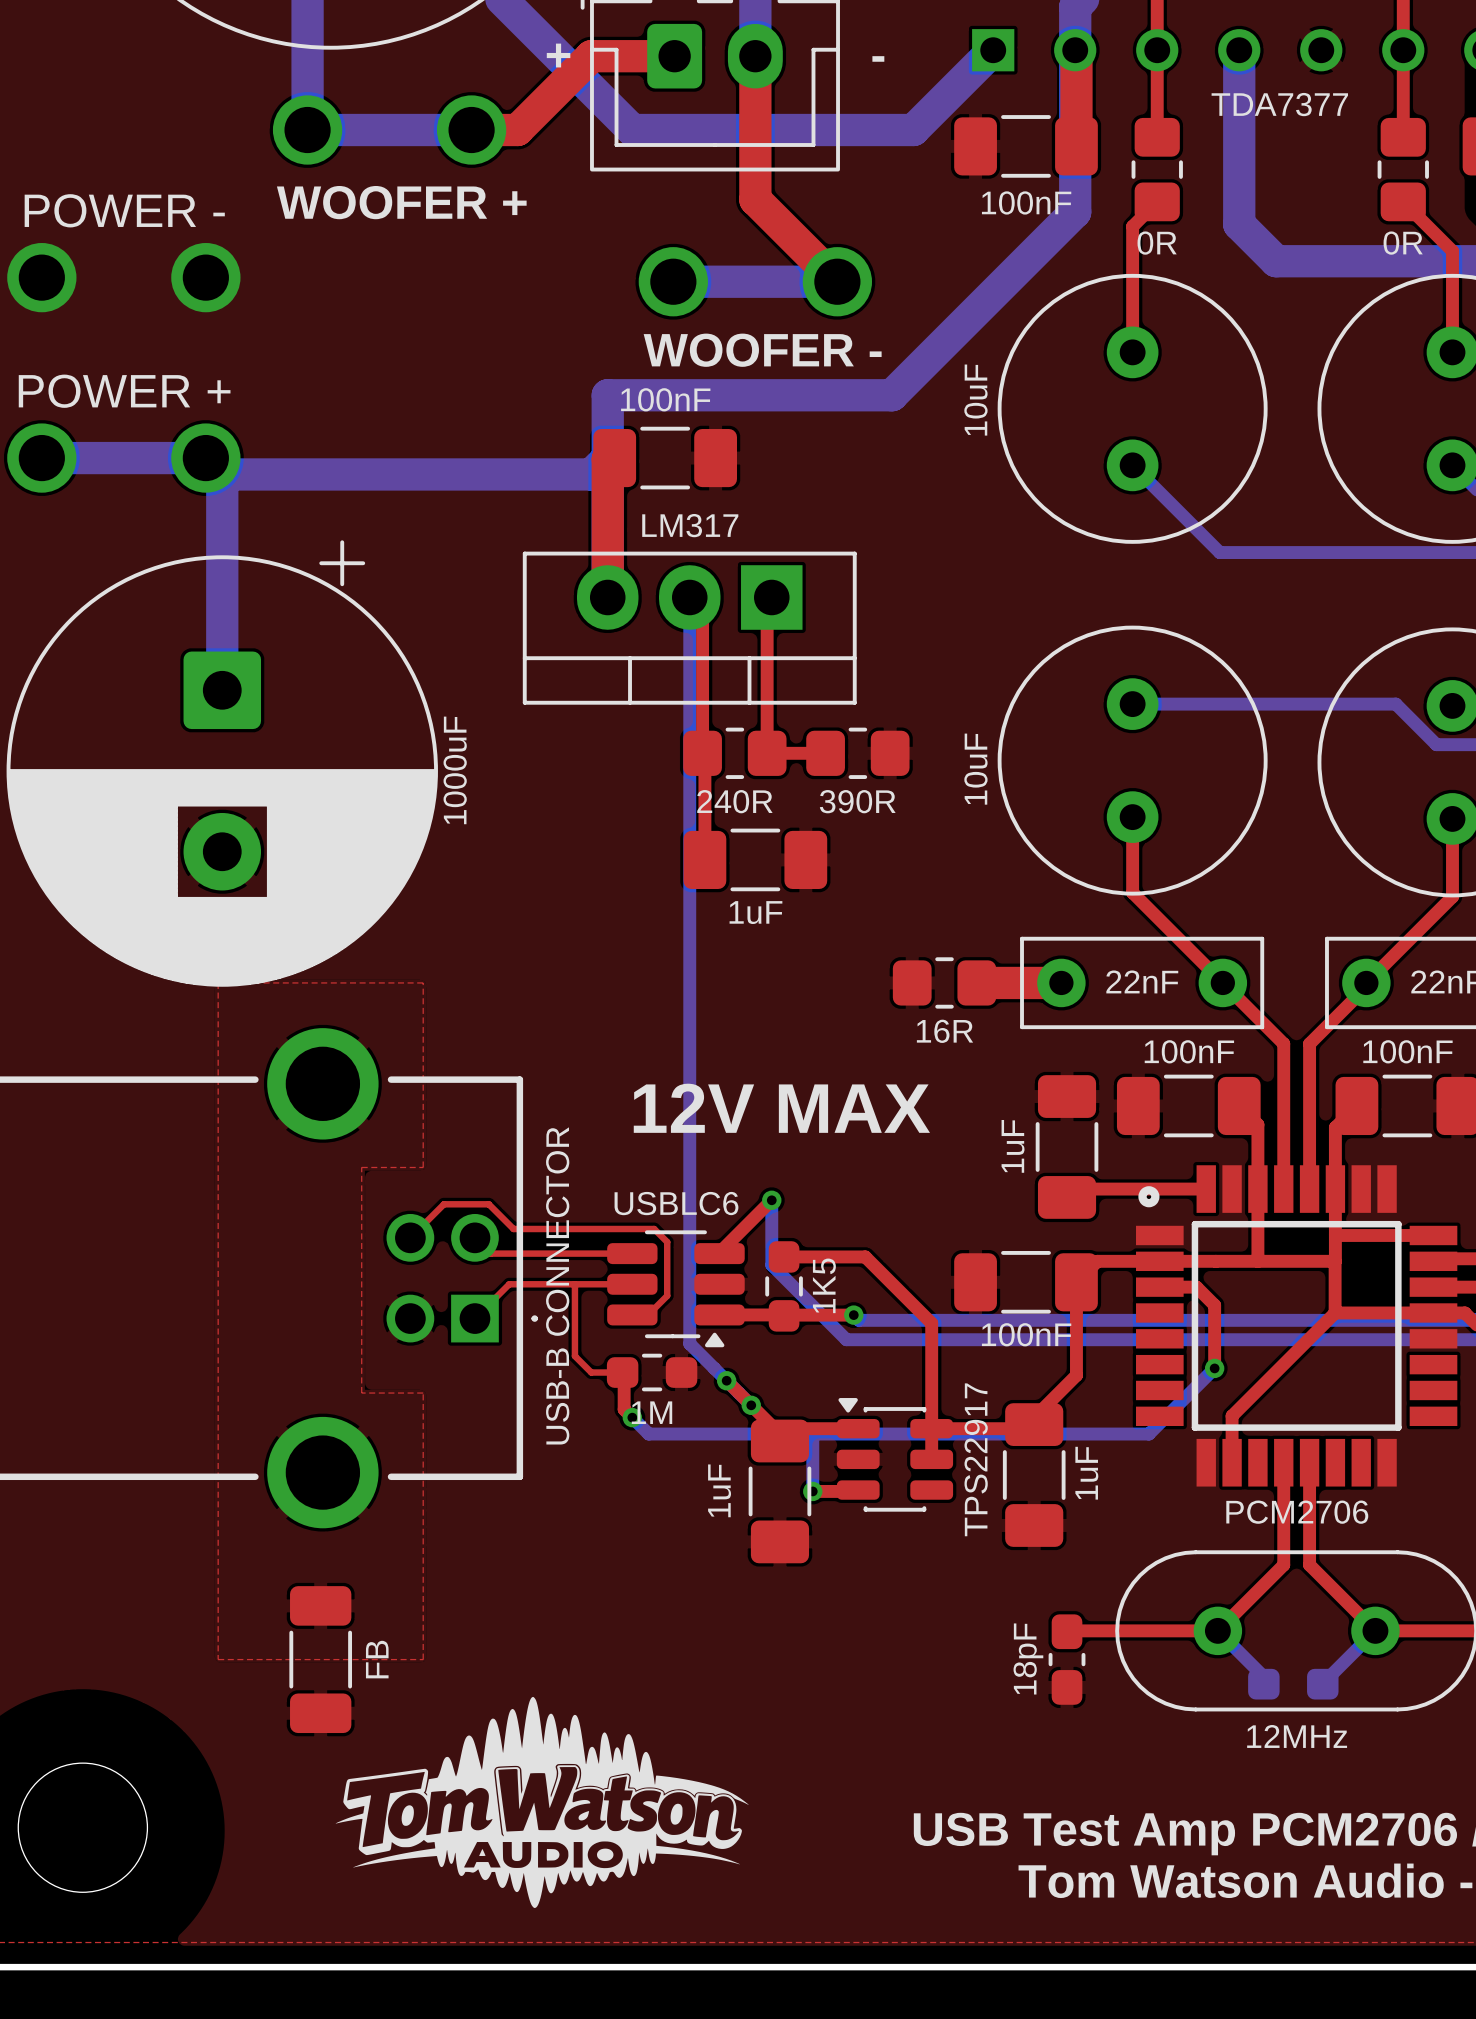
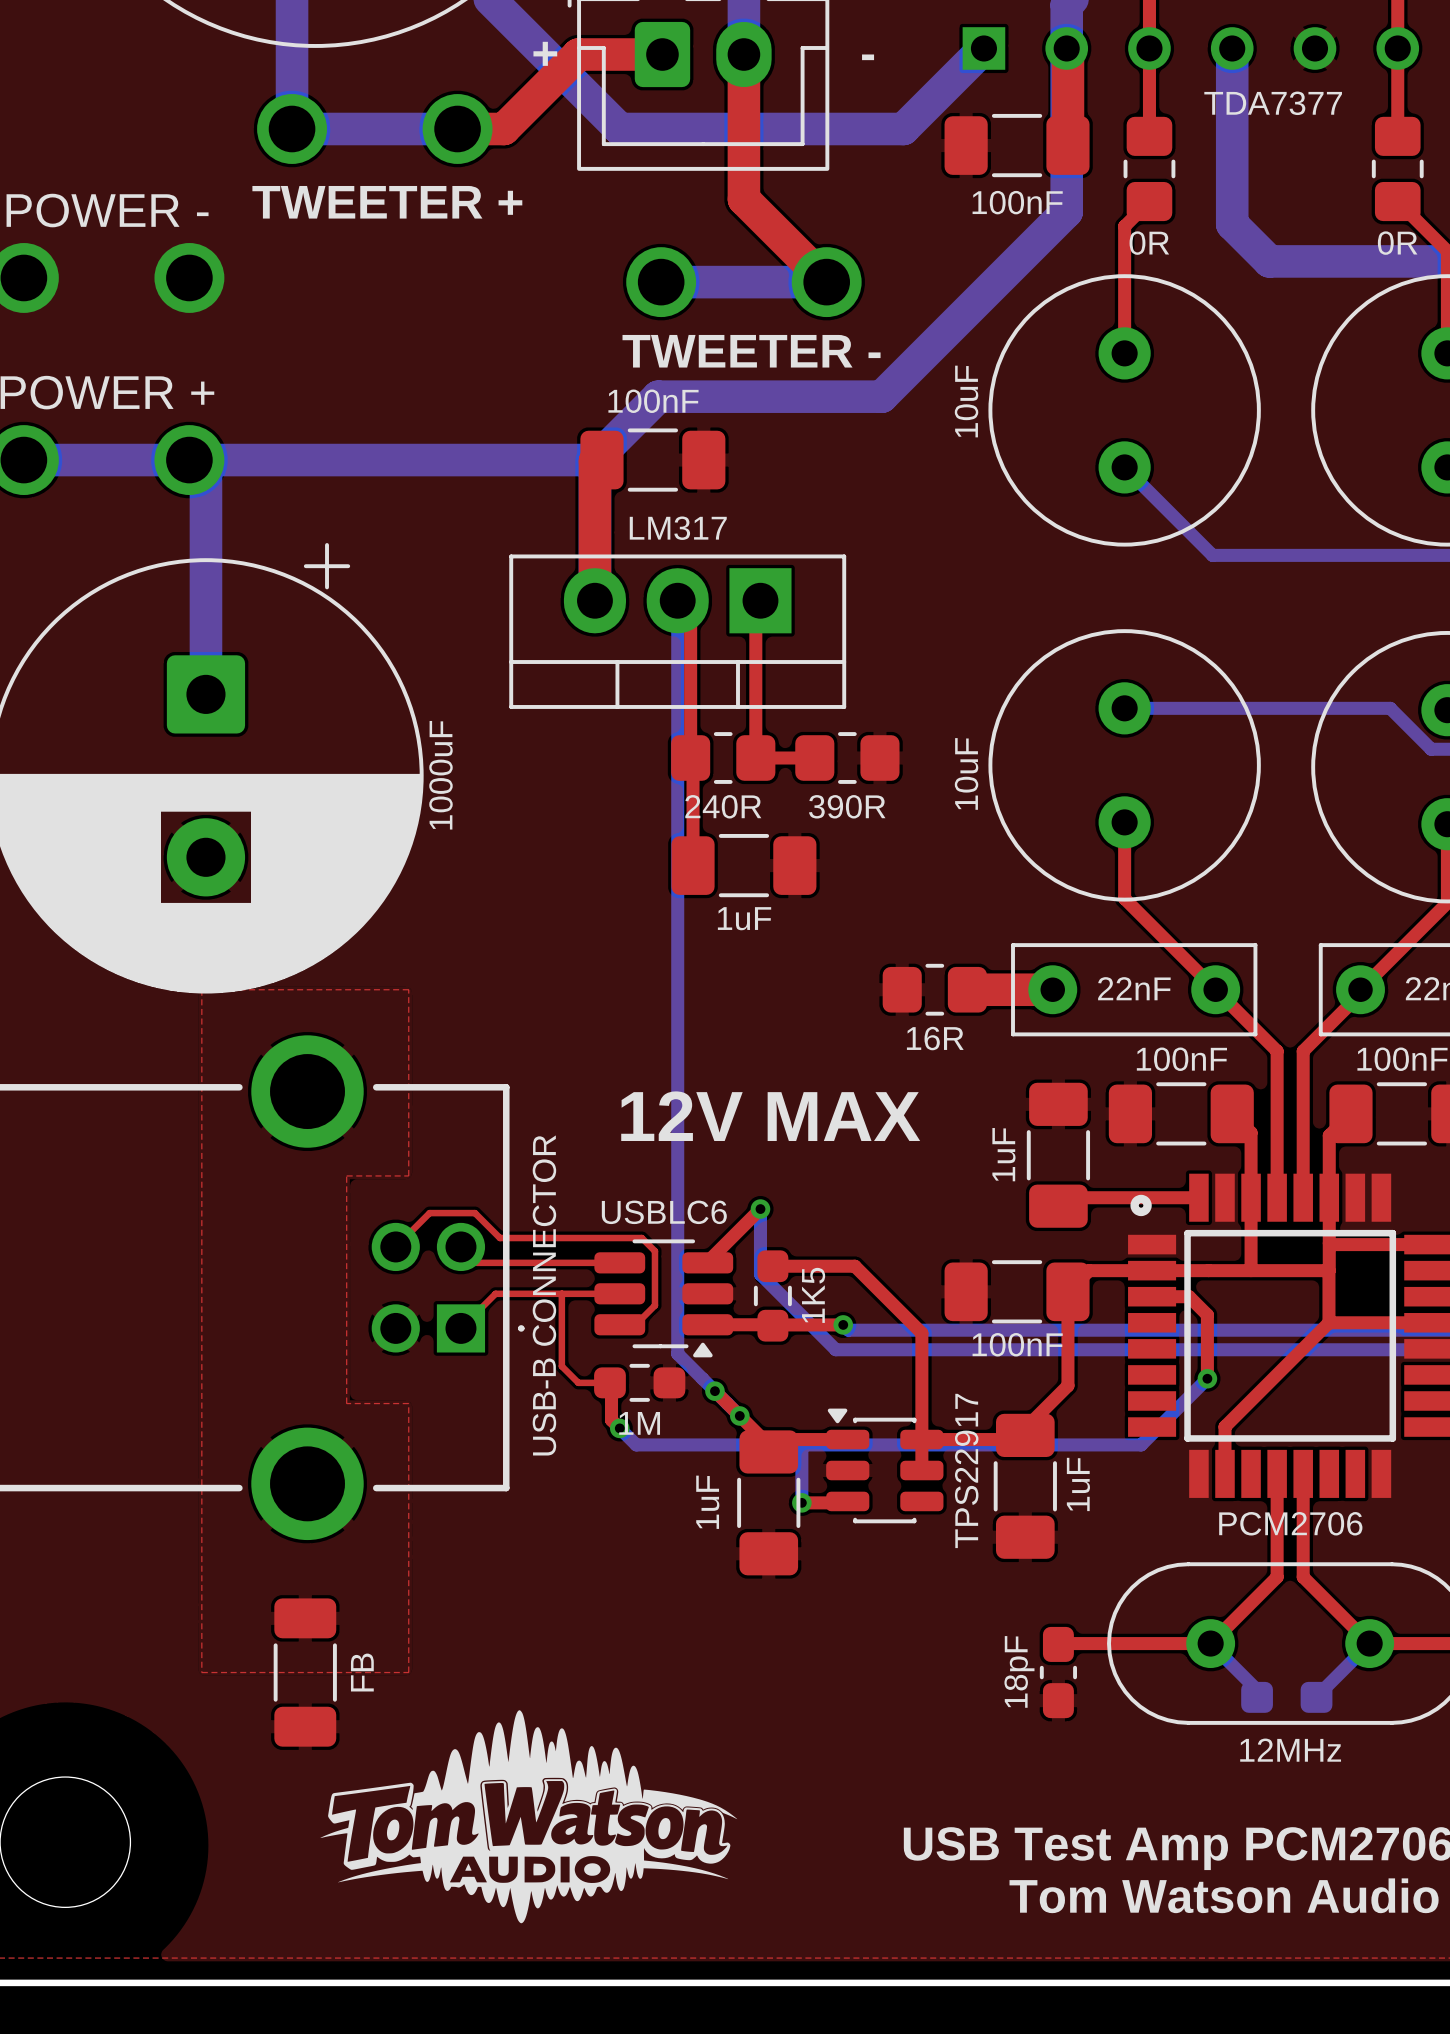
text: WOOFER + (401, 202) -> TWEETER + (387, 202)
text: WOOFER - (762, 350) -> TWEETER - (751, 351)
bottom track: (670, 395) (607, 395) (607, 458) (591, 474) (222, 474) -> (658, 396) (594, 460) (189, 460)

